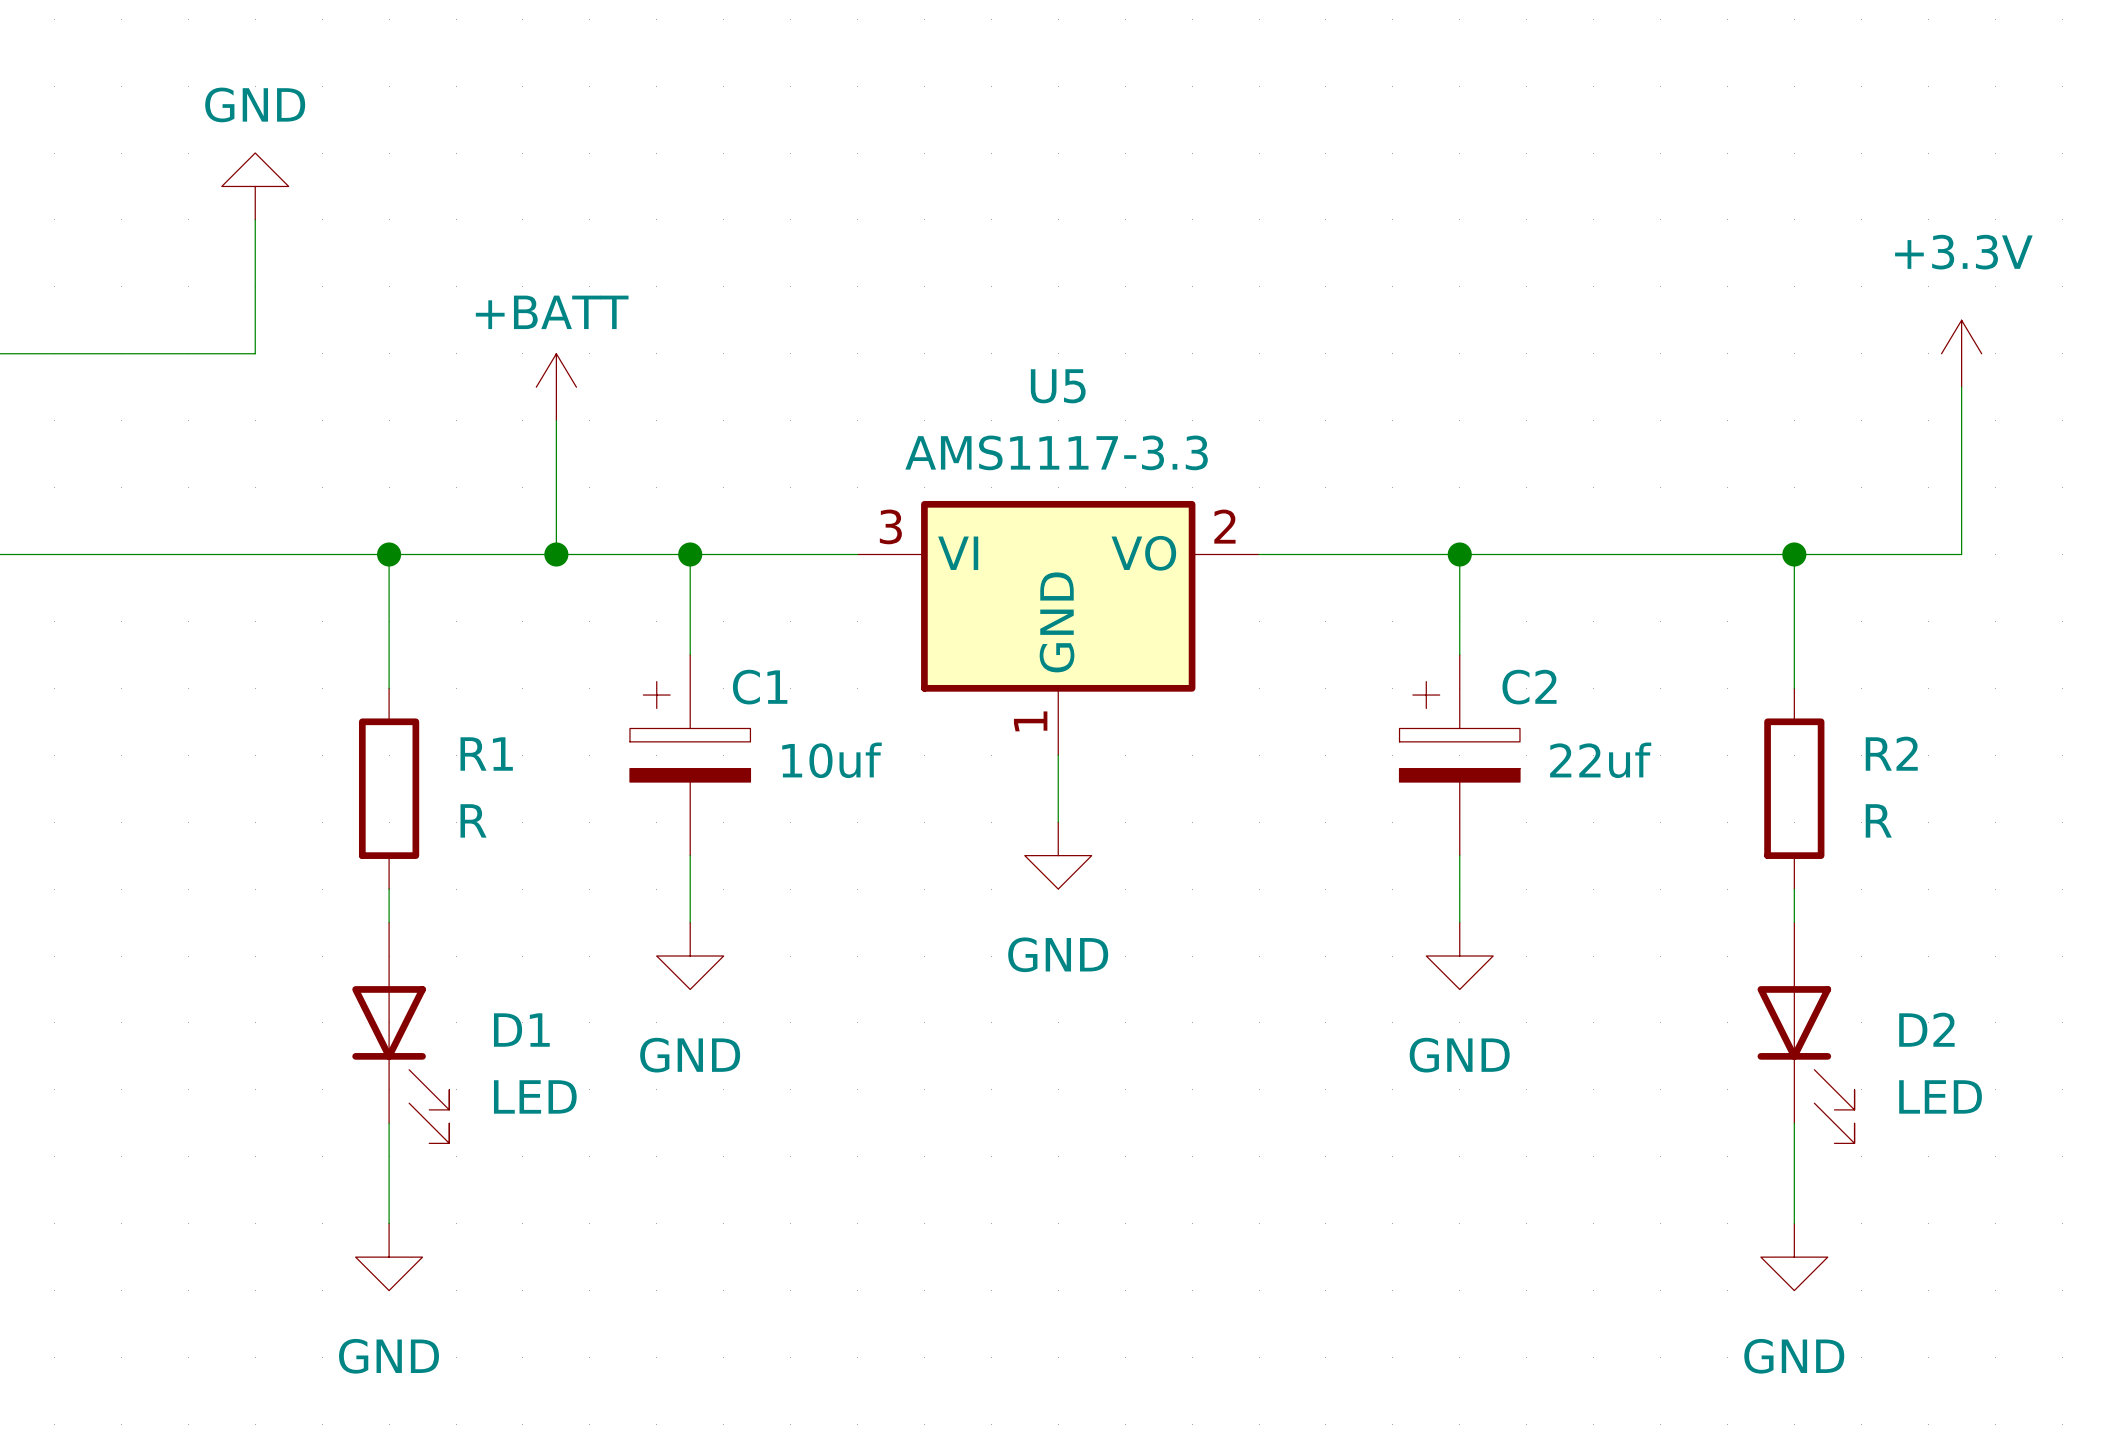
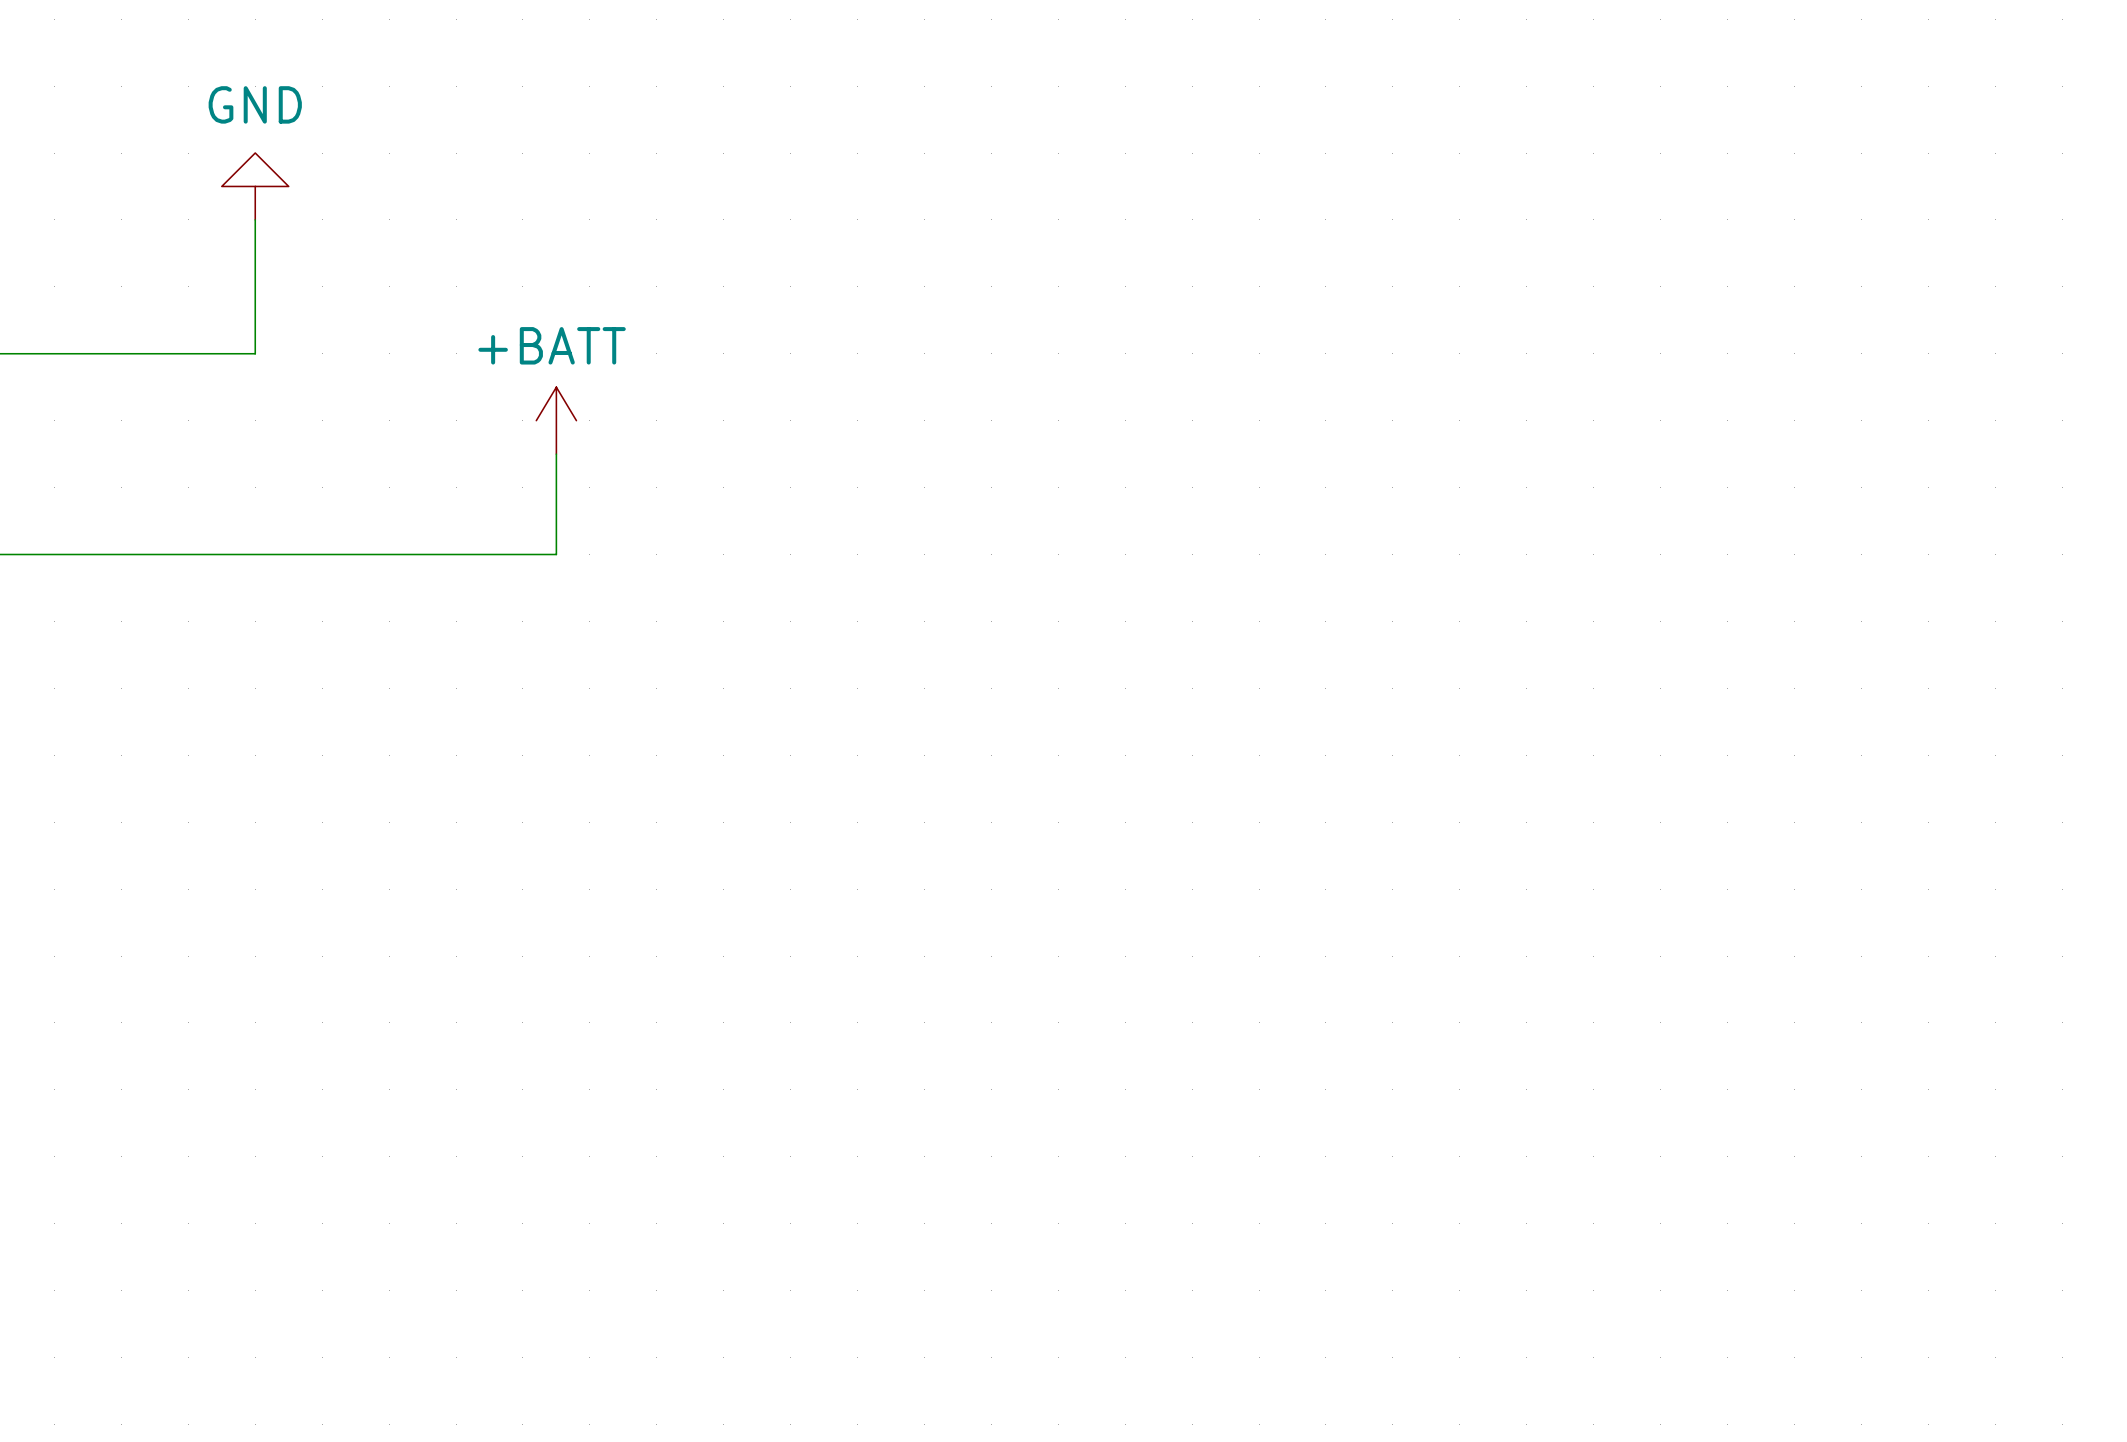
power symbol: +3.3V (1961, 353) -> none
power symbol position: +BATT (556, 387) -> +BATT (556, 420)
wire: (1961, 387) (1961, 554) (1259, 554) -> none
wire: (389, 554) (389, 688) -> none
junction: (389, 554) -> none
wire: (556, 554) (857, 554) -> none
junction: (556, 554) -> none
wire: (690, 554) (690, 654) -> none
junction: (690, 554) -> none
wire: (1459, 554) (1459, 654) -> none
junction: (1459, 554) -> none
wire: (1794, 554) (1794, 688) -> none
junction: (1794, 554) -> none
U5: AMS1117-3.3 (1058, 628) -> none
C1: 10uf (690, 755) -> none
wire: (1058, 755) (1058, 822) -> none
C2: 22uf (1459, 755) -> none
R1: R (389, 788) -> none
R2: R (1794, 788) -> none
wire: (690, 855) (690, 922) -> none
power symbol: GND (1058, 855) -> none
wire: (1459, 855) (1459, 922) -> none
wire: (389, 889) (389, 922) -> none
wire: (1794, 889) (1794, 922) -> none
power symbol: GND (690, 956) -> none
power symbol: GND (1459, 956) -> none
D1: LED (400, 1032) -> none
D2: LED (1806, 1032) -> none
wire: (389, 1123) (389, 1223) -> none
wire: (1794, 1123) (1794, 1223) -> none
power symbol: GND (389, 1257) -> none
power symbol: GND (1794, 1257) -> none

